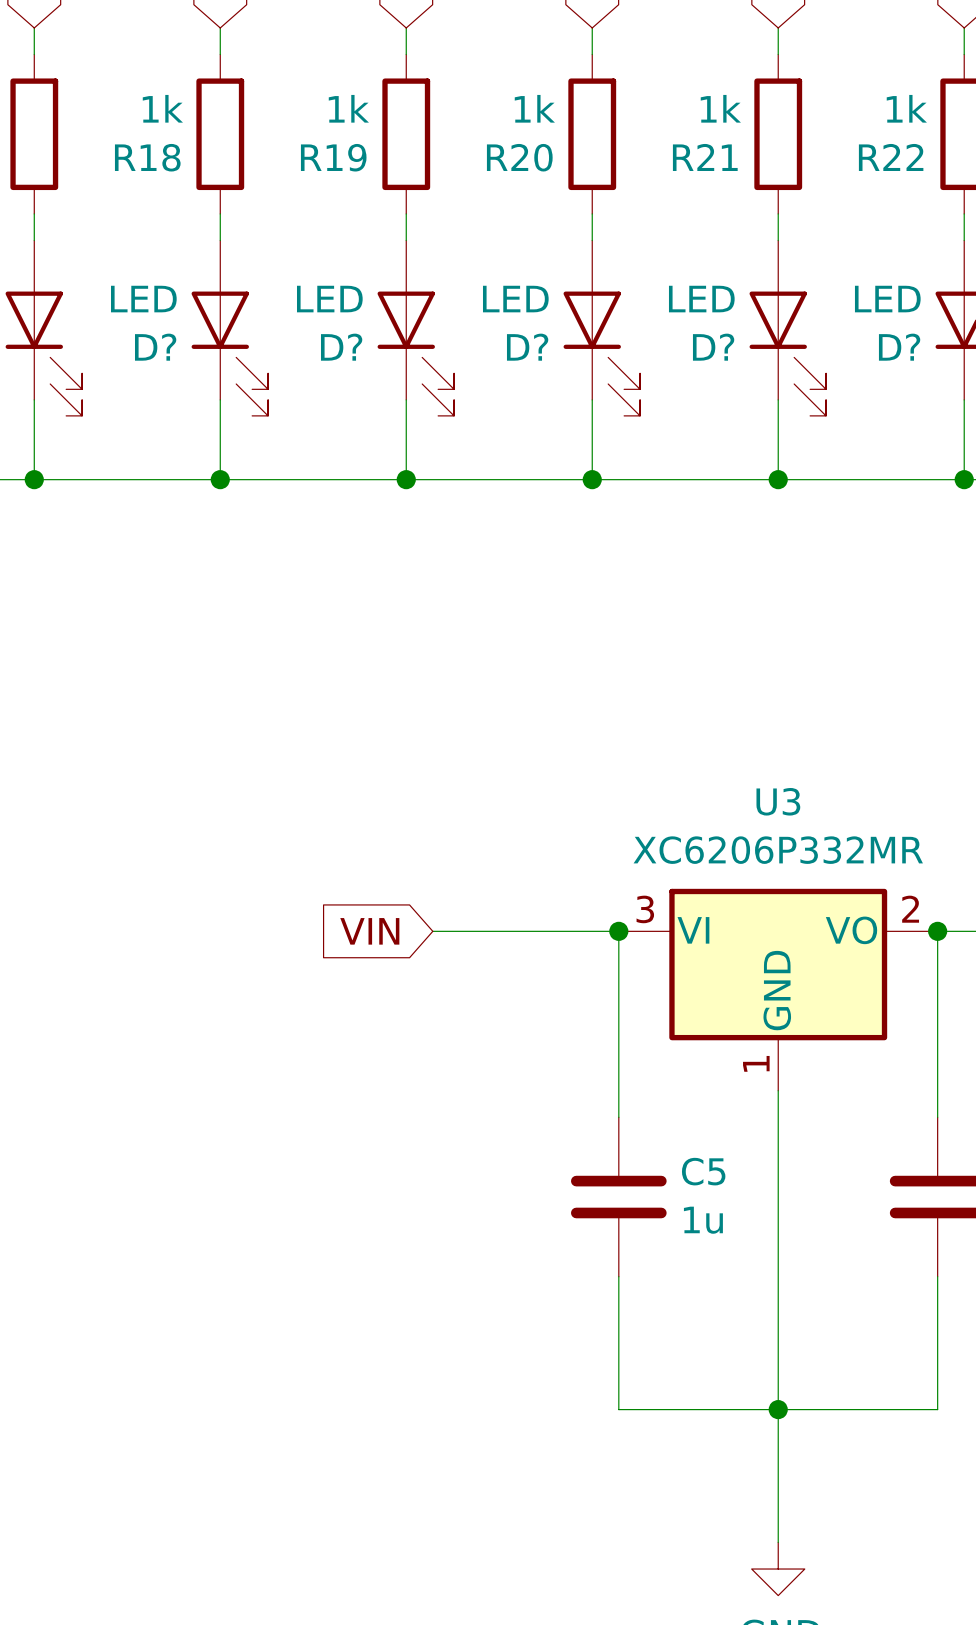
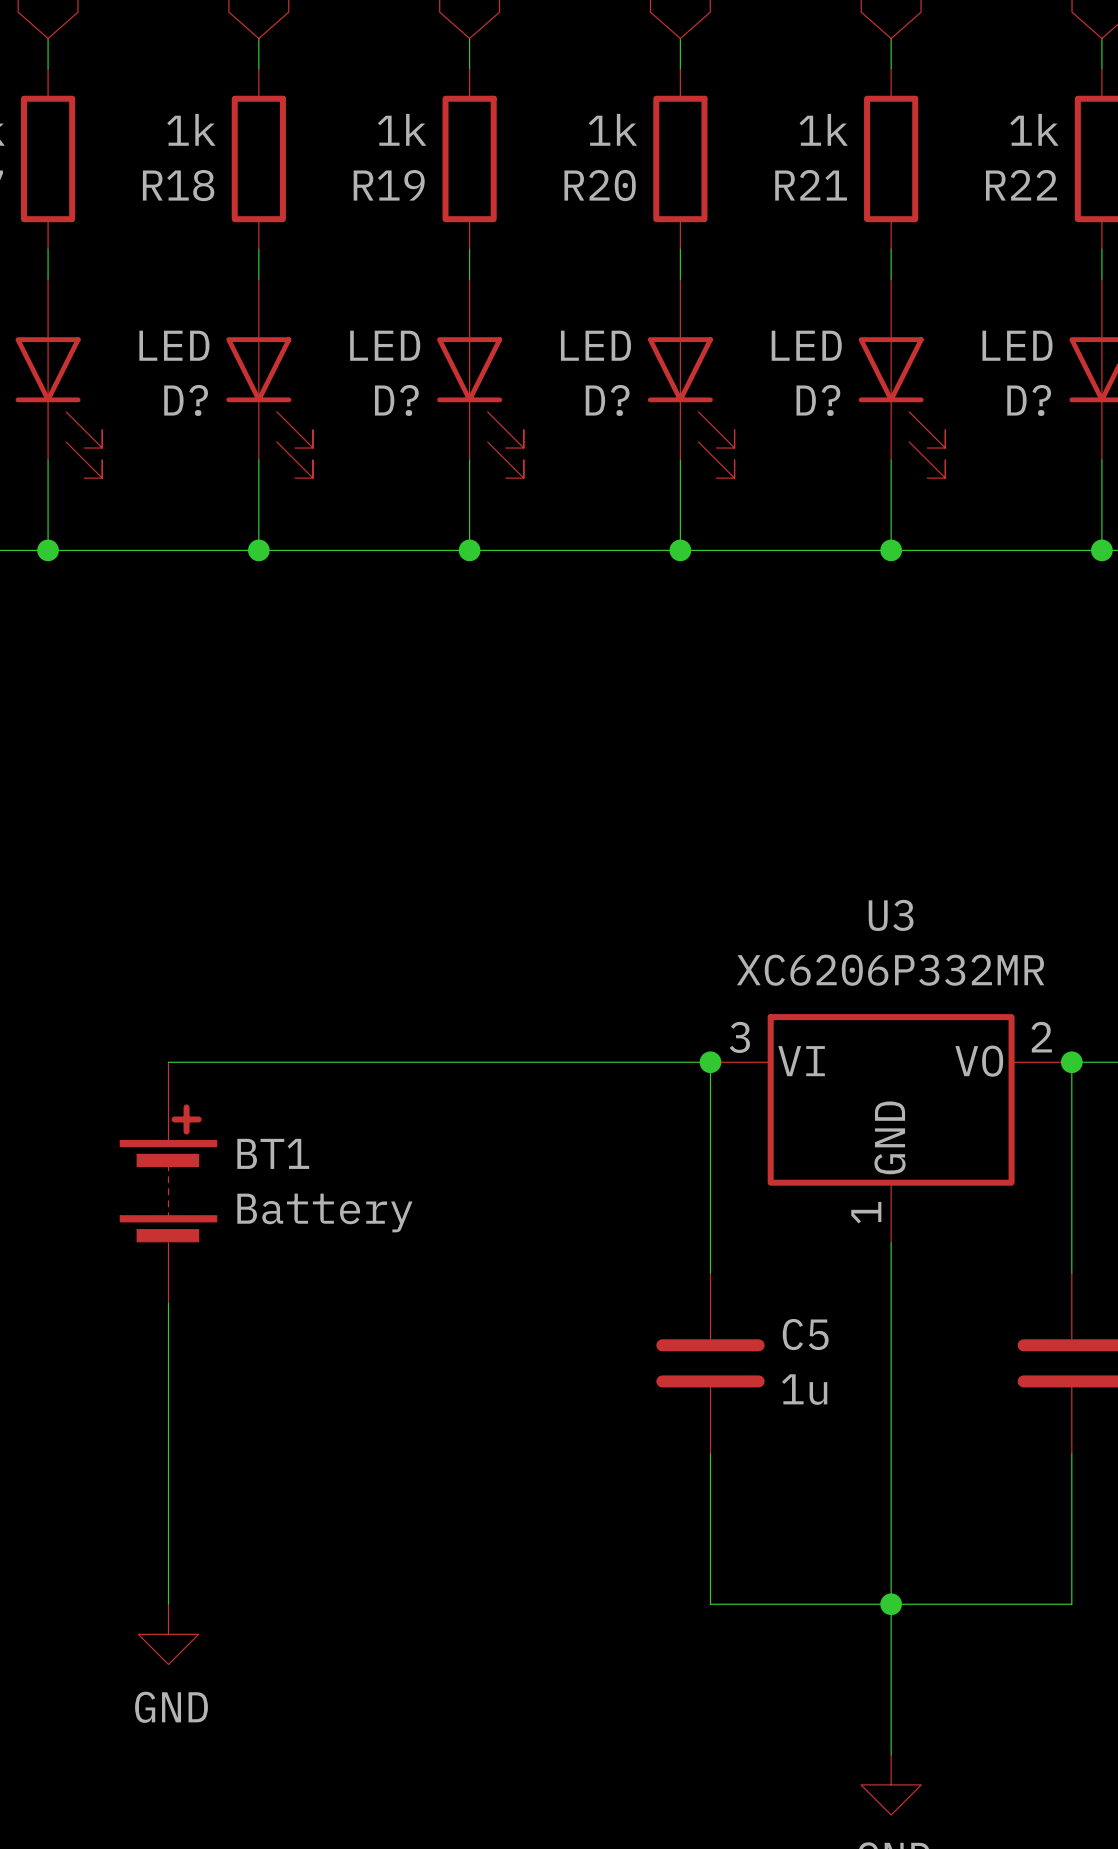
wire: none -> (168, 1062) (499, 1062)
global label: VIN (369, 931) -> none
BT1: none -> Battery (168, 1182)
wire: none -> (168, 1303) (168, 1604)
power symbol: none -> GND (168, 1634)

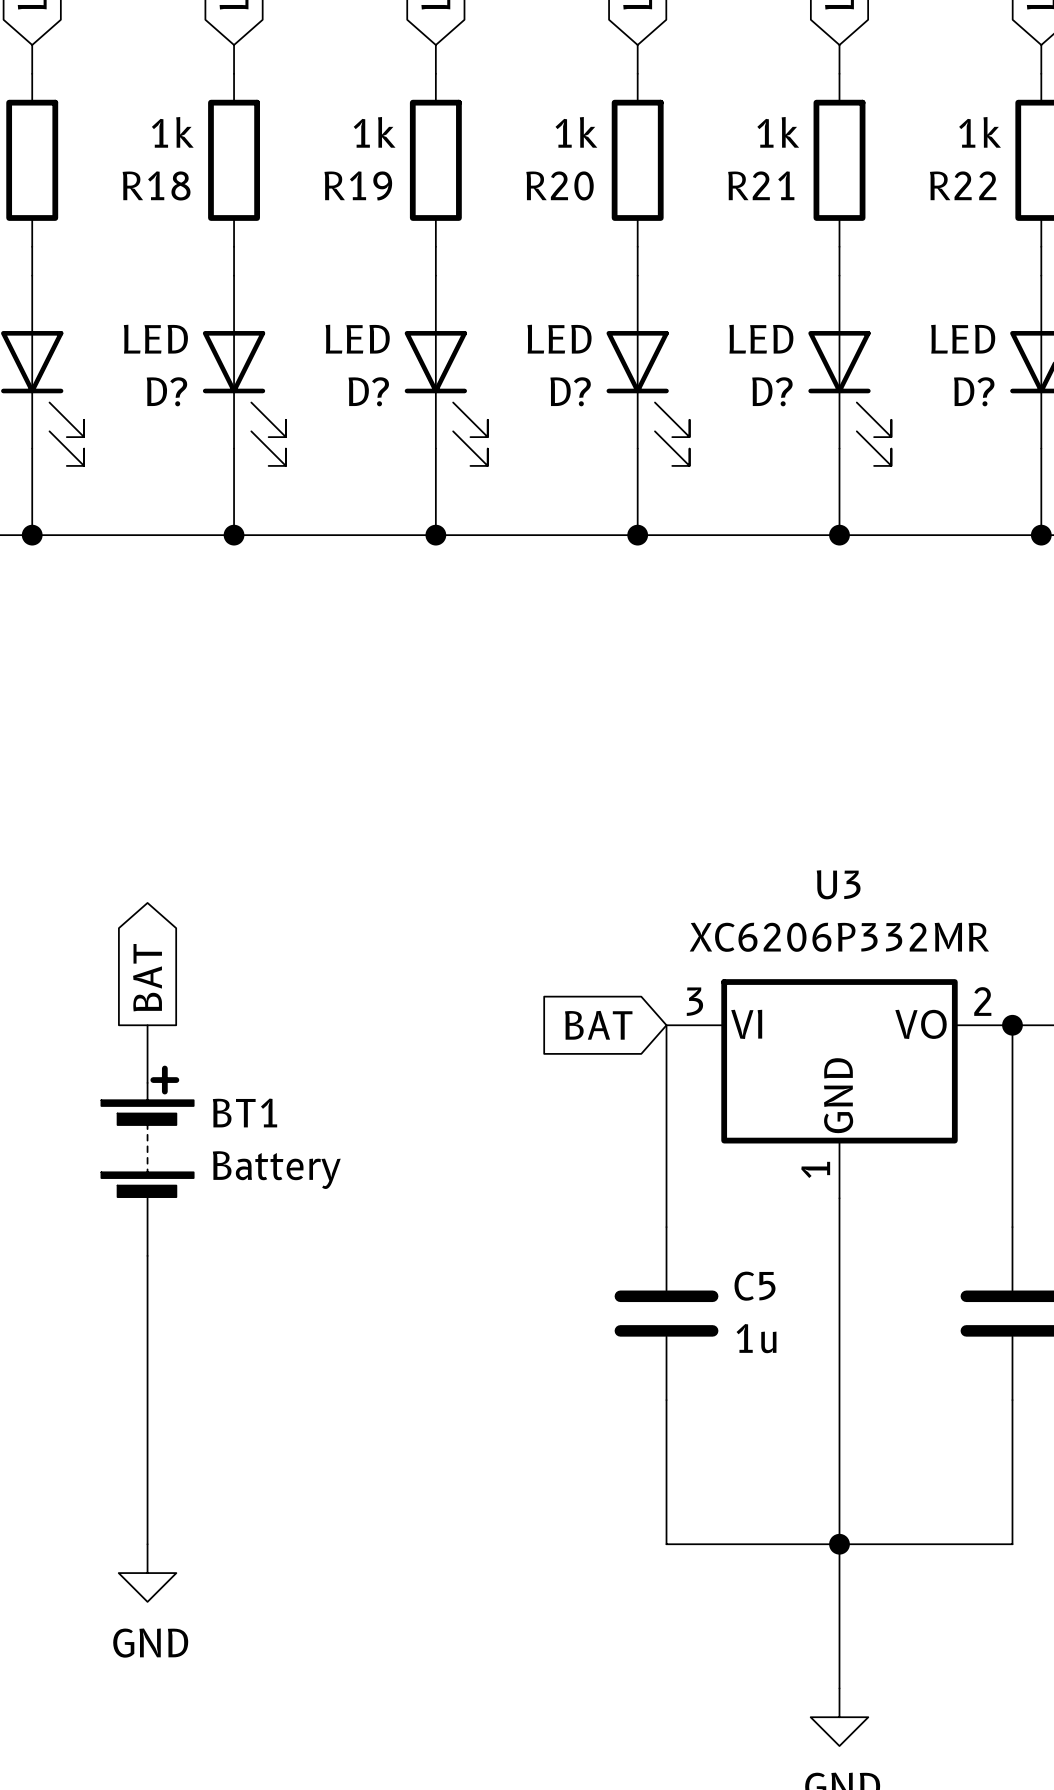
global label: none -> BAT (147, 977)
wire: (168, 1062) (710, 1062) -> none
global label: none -> BAT (598, 1025)
junction: (710, 1062) -> none

